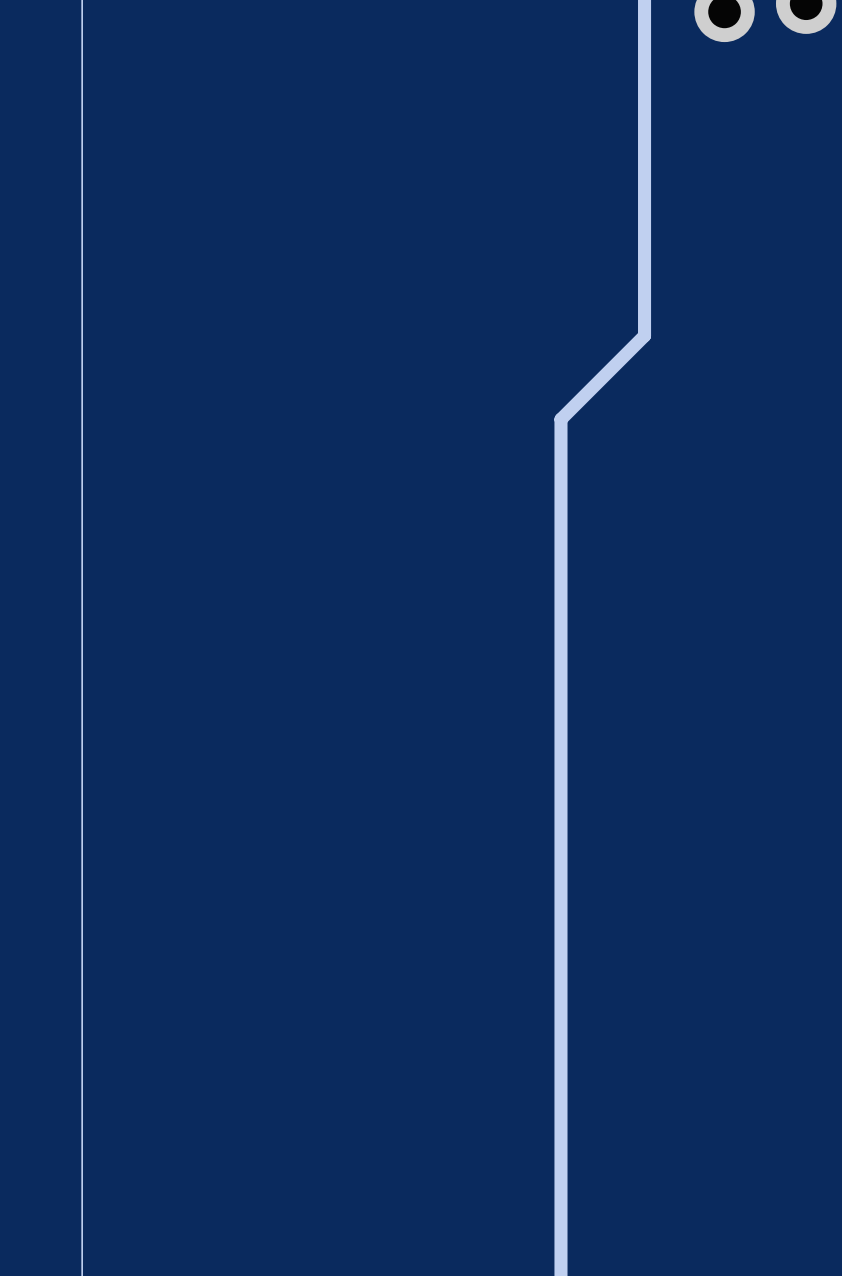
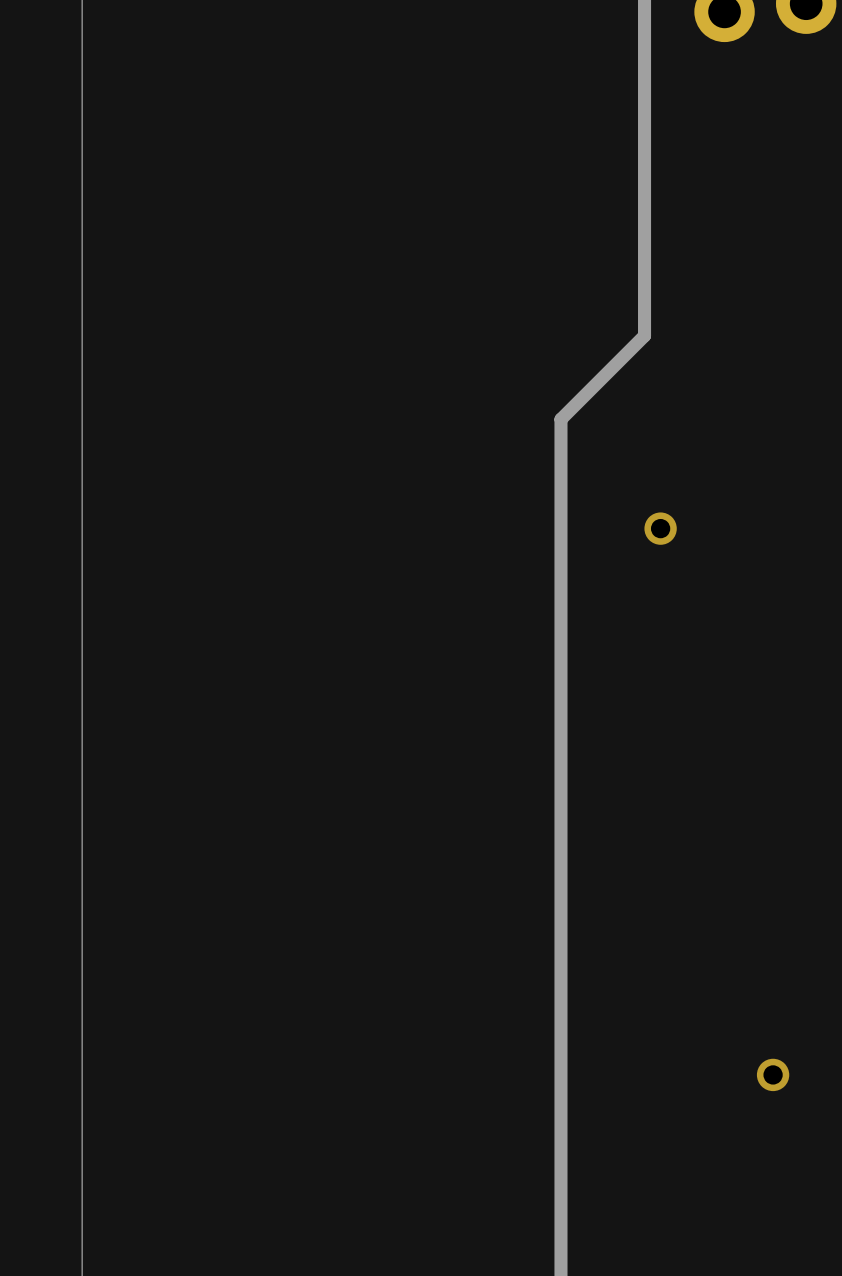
via: none -> (660, 528)
via: none -> (773, 1074)

